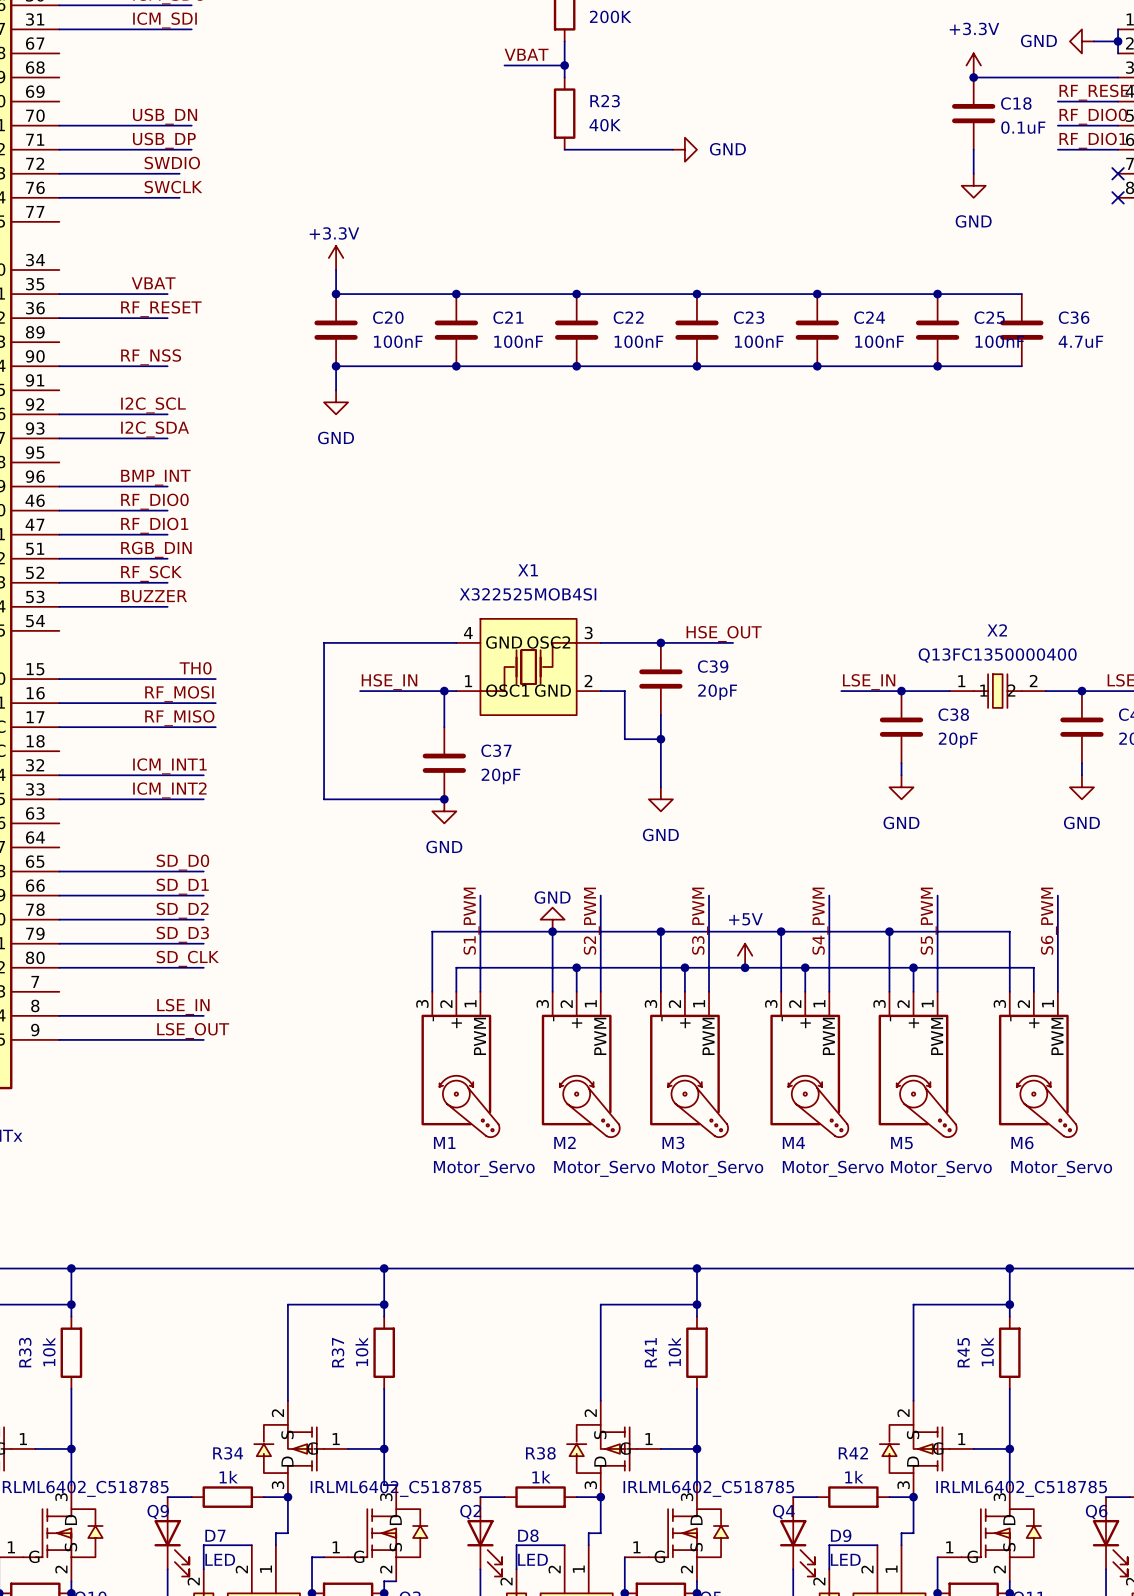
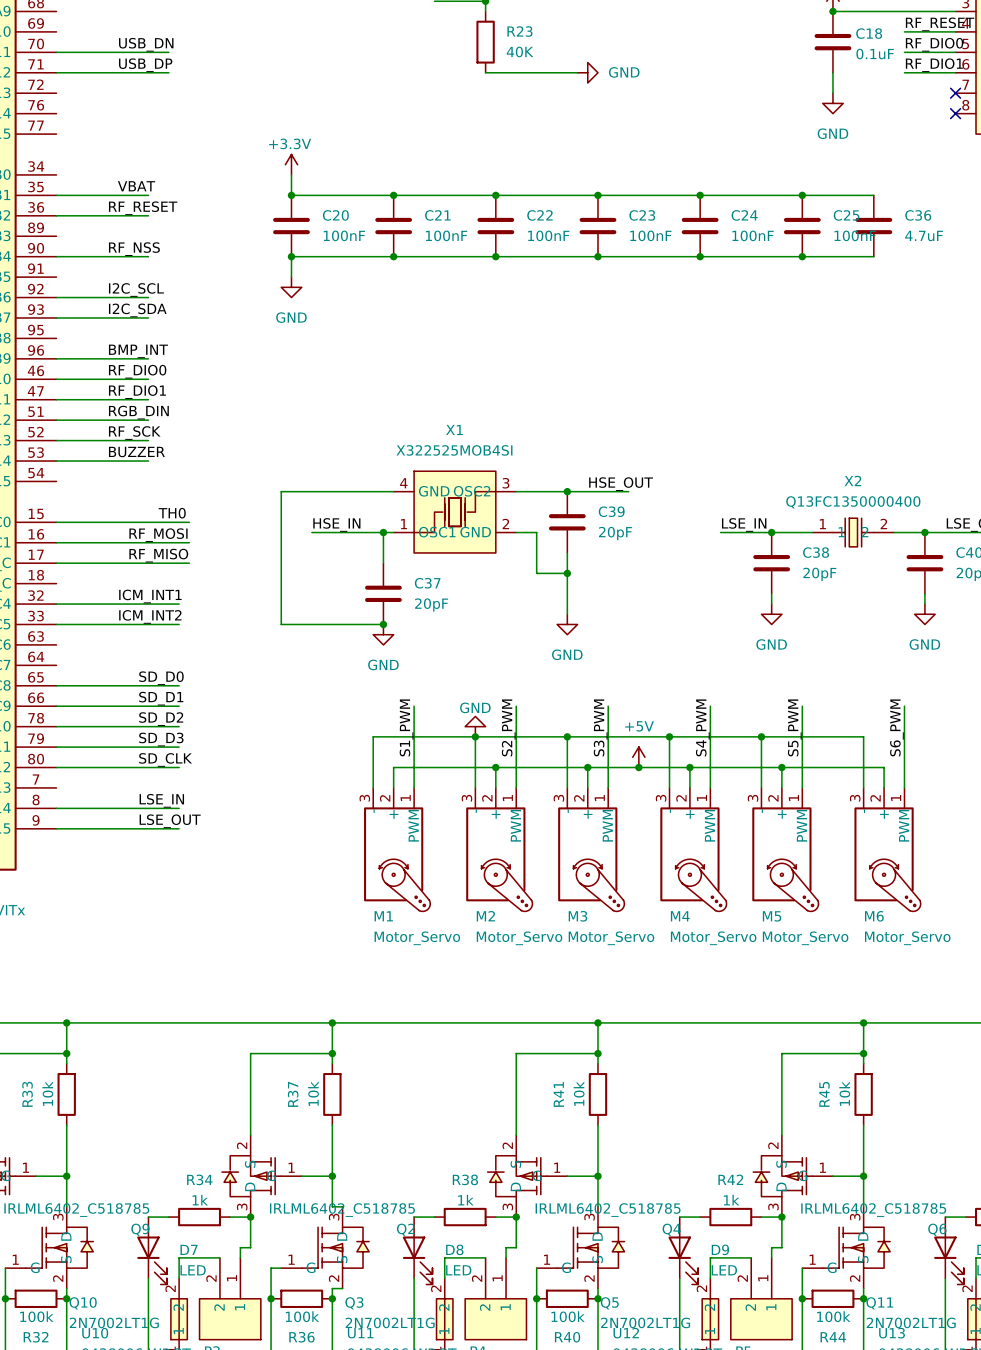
label: SWDIO (172, 163) -> none
wire: (59, 173) (179, 173) -> none
label: SWCLK (173, 187) -> none
wire: (59, 197) (179, 197) -> none

